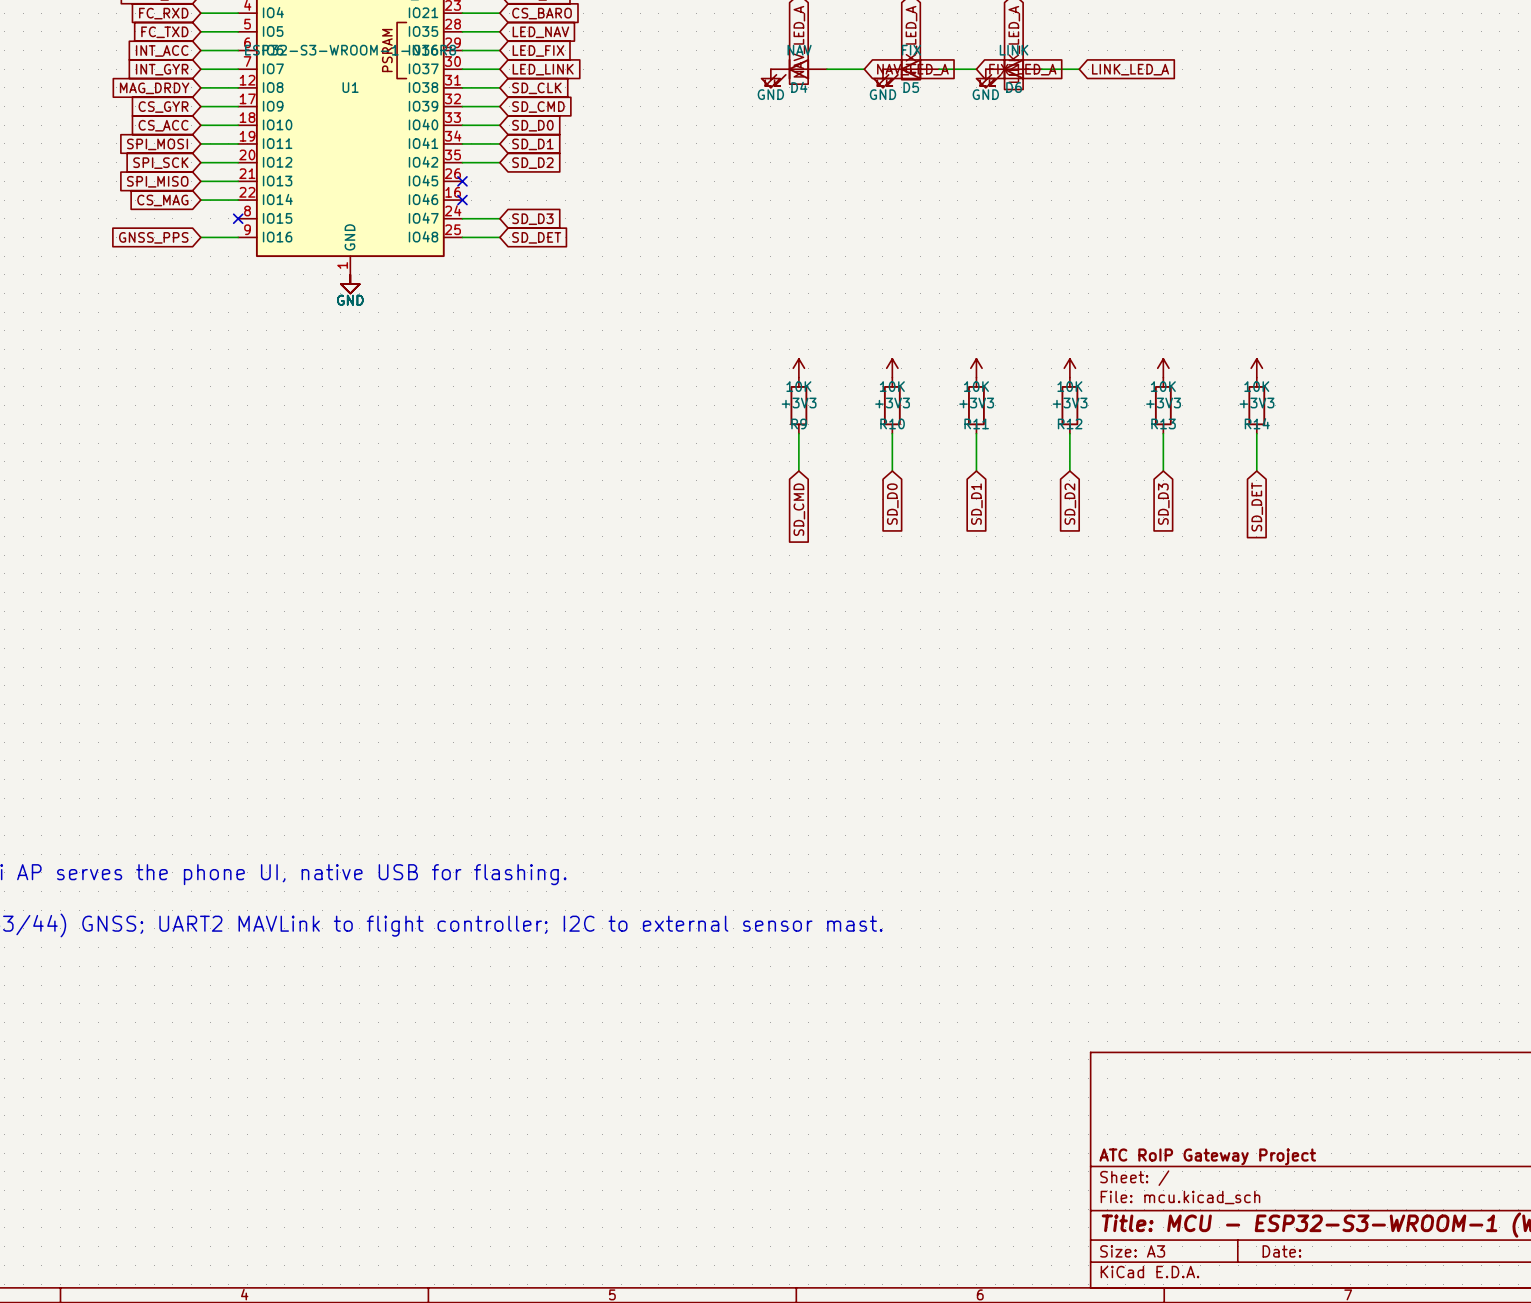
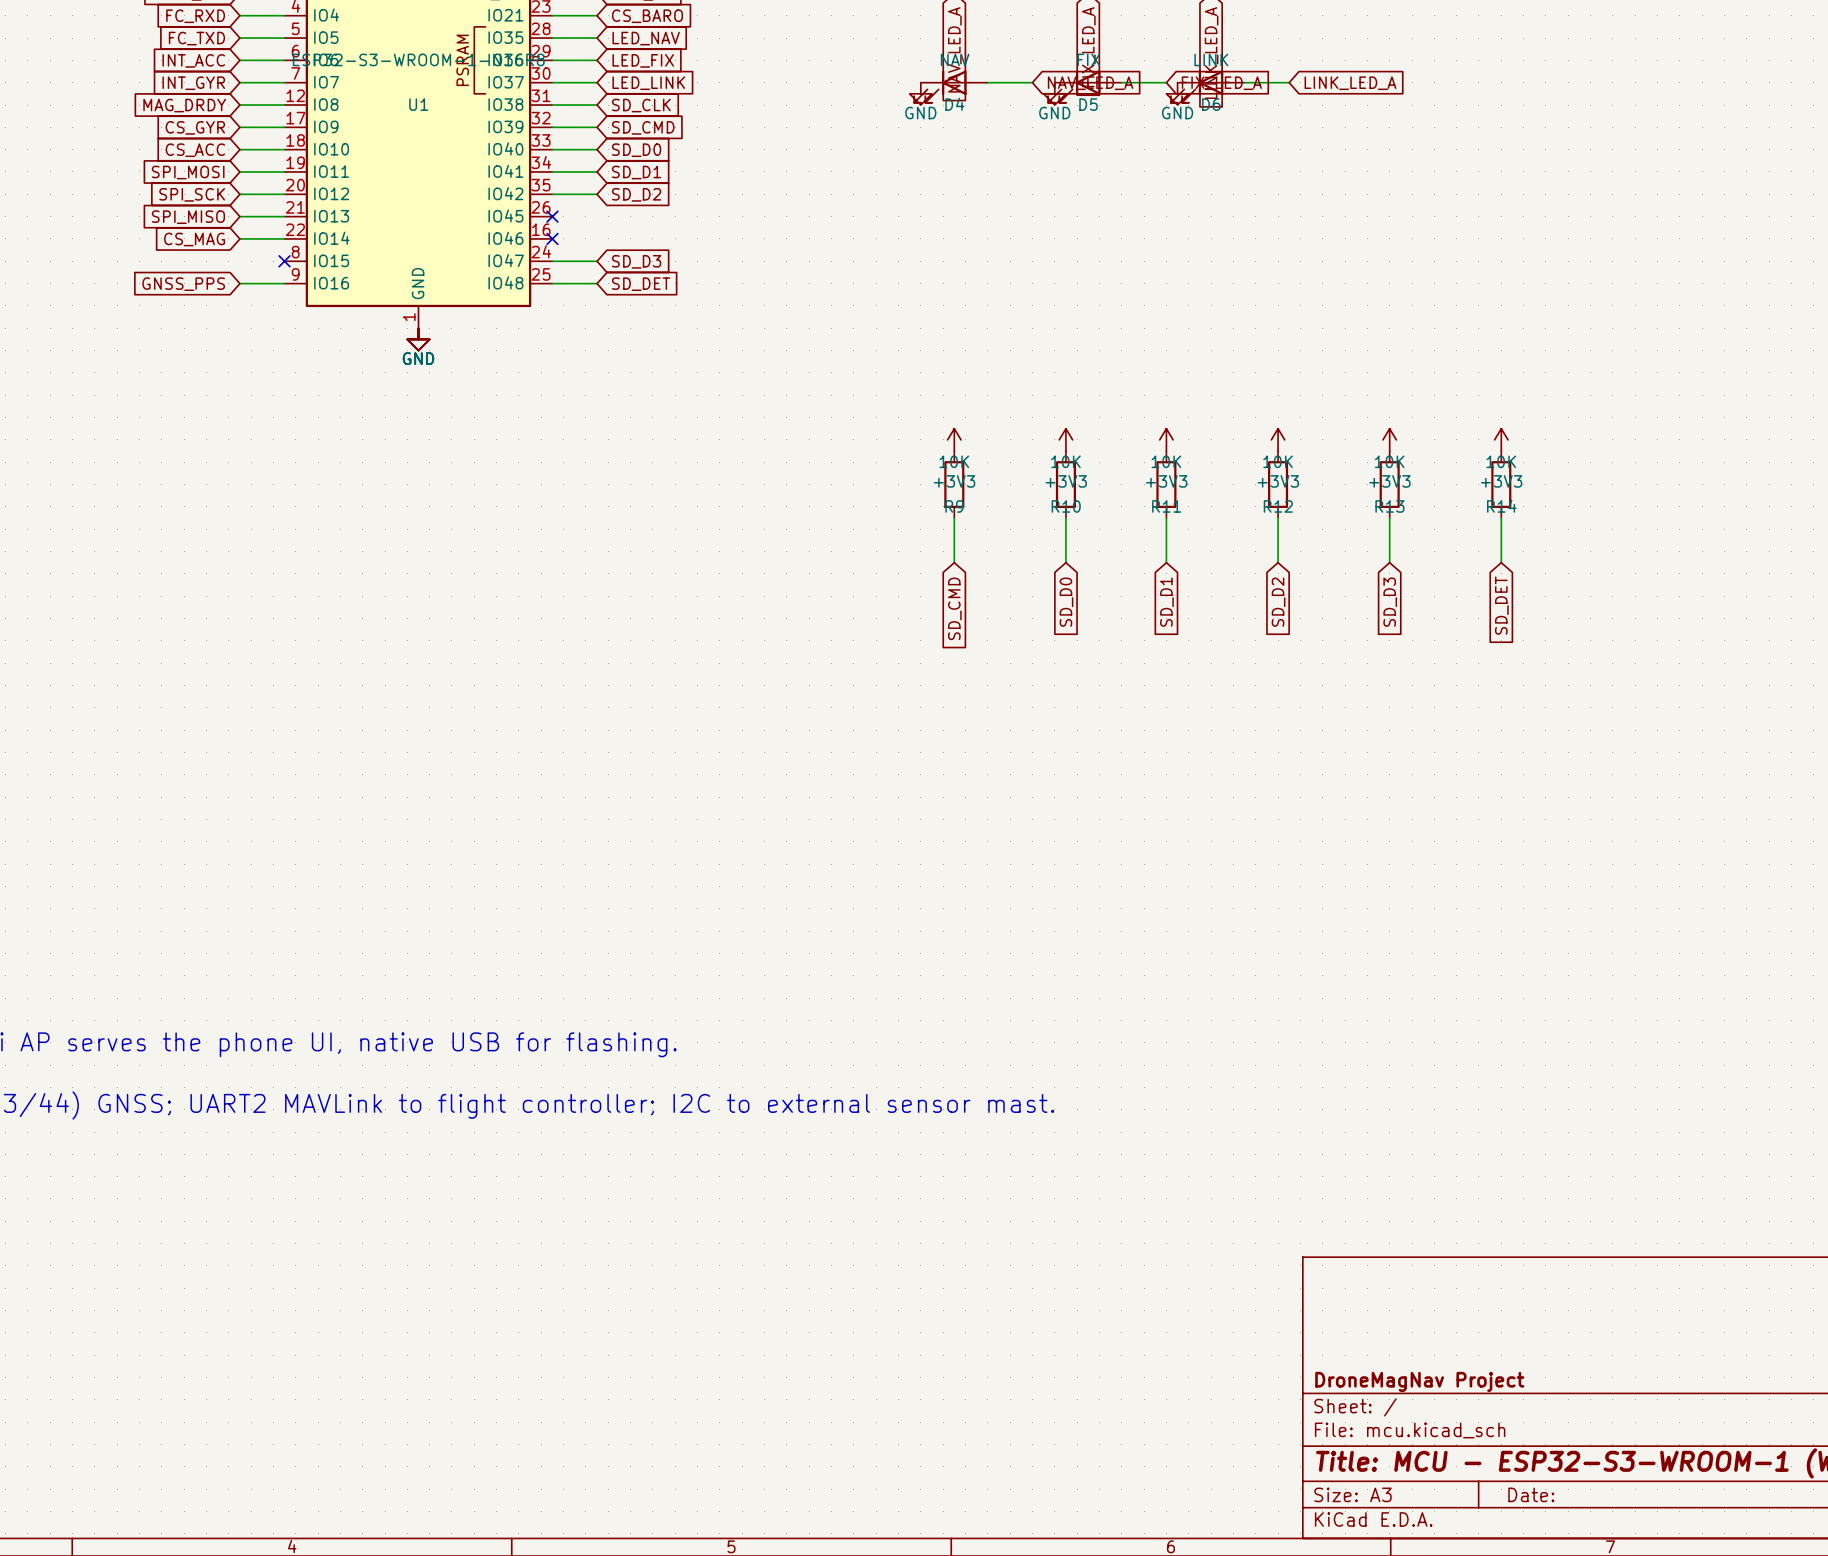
title block: ATC RoIP Gateway Project (1207, 1156) -> DroneMagNav Project (1419, 1381)

